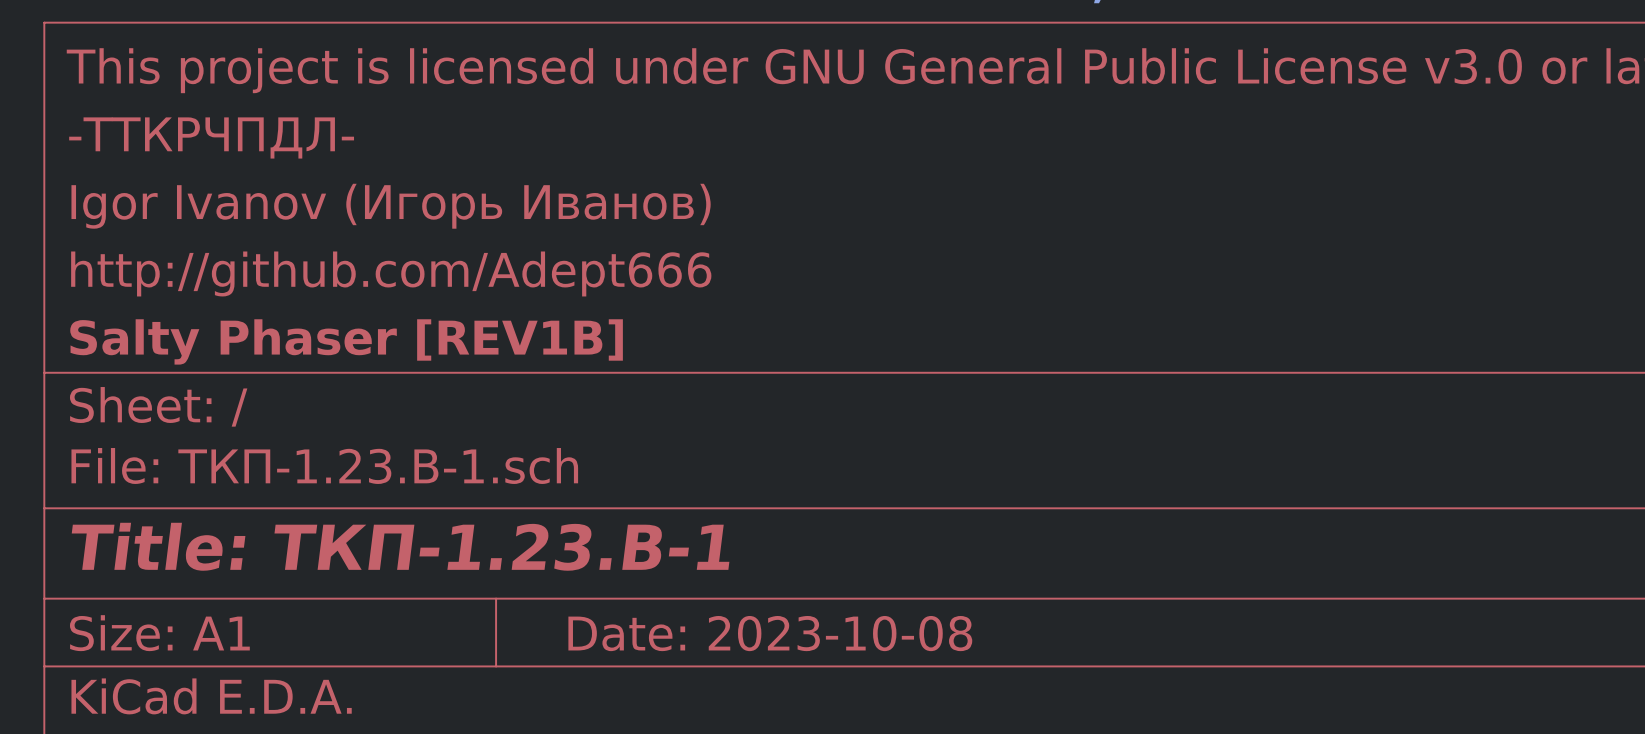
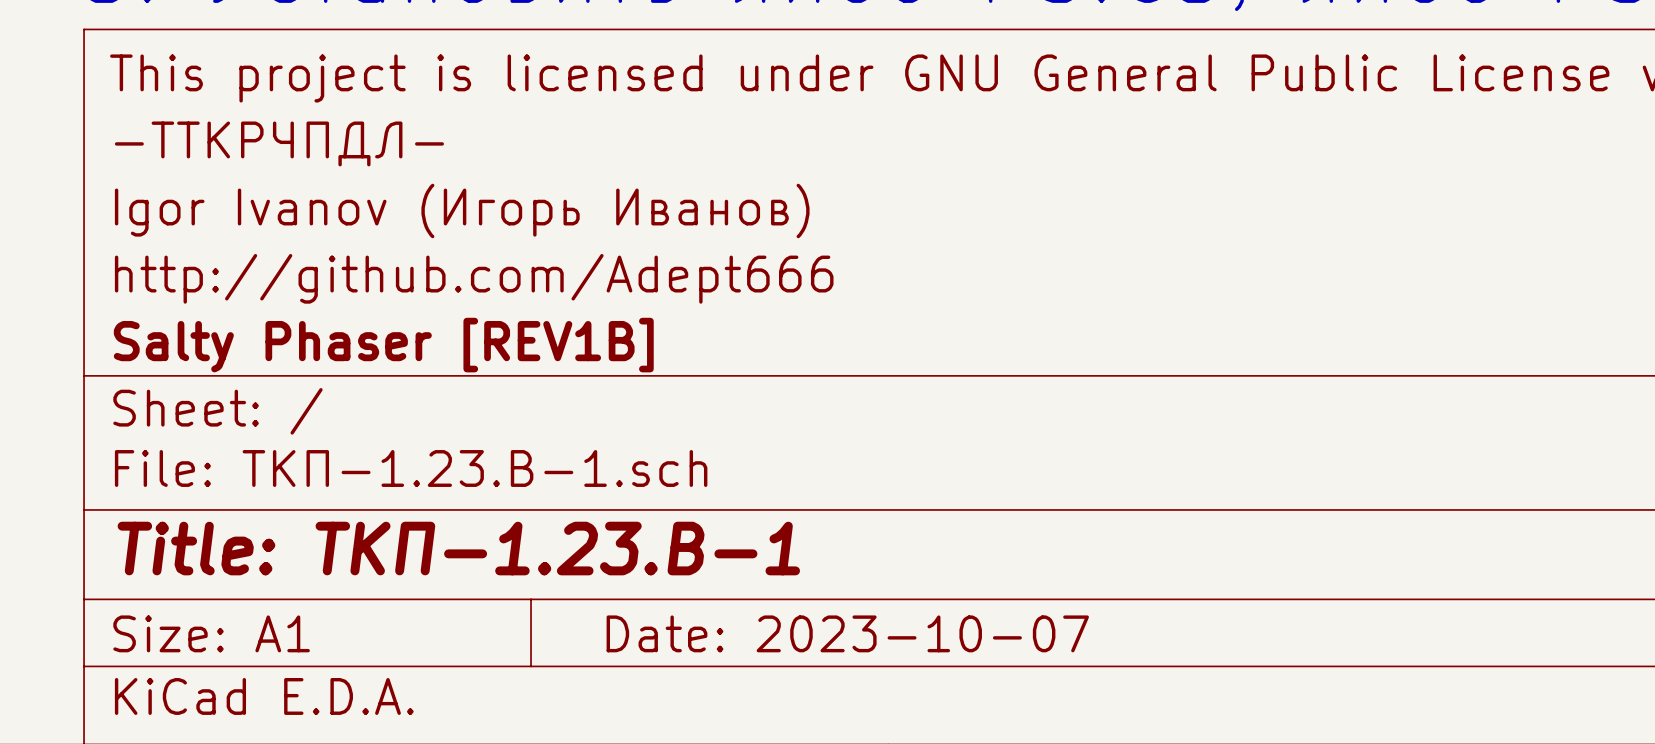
title block: Date: 2023-10-08 (770, 633) -> Date: 2023-10-07 (847, 633)

